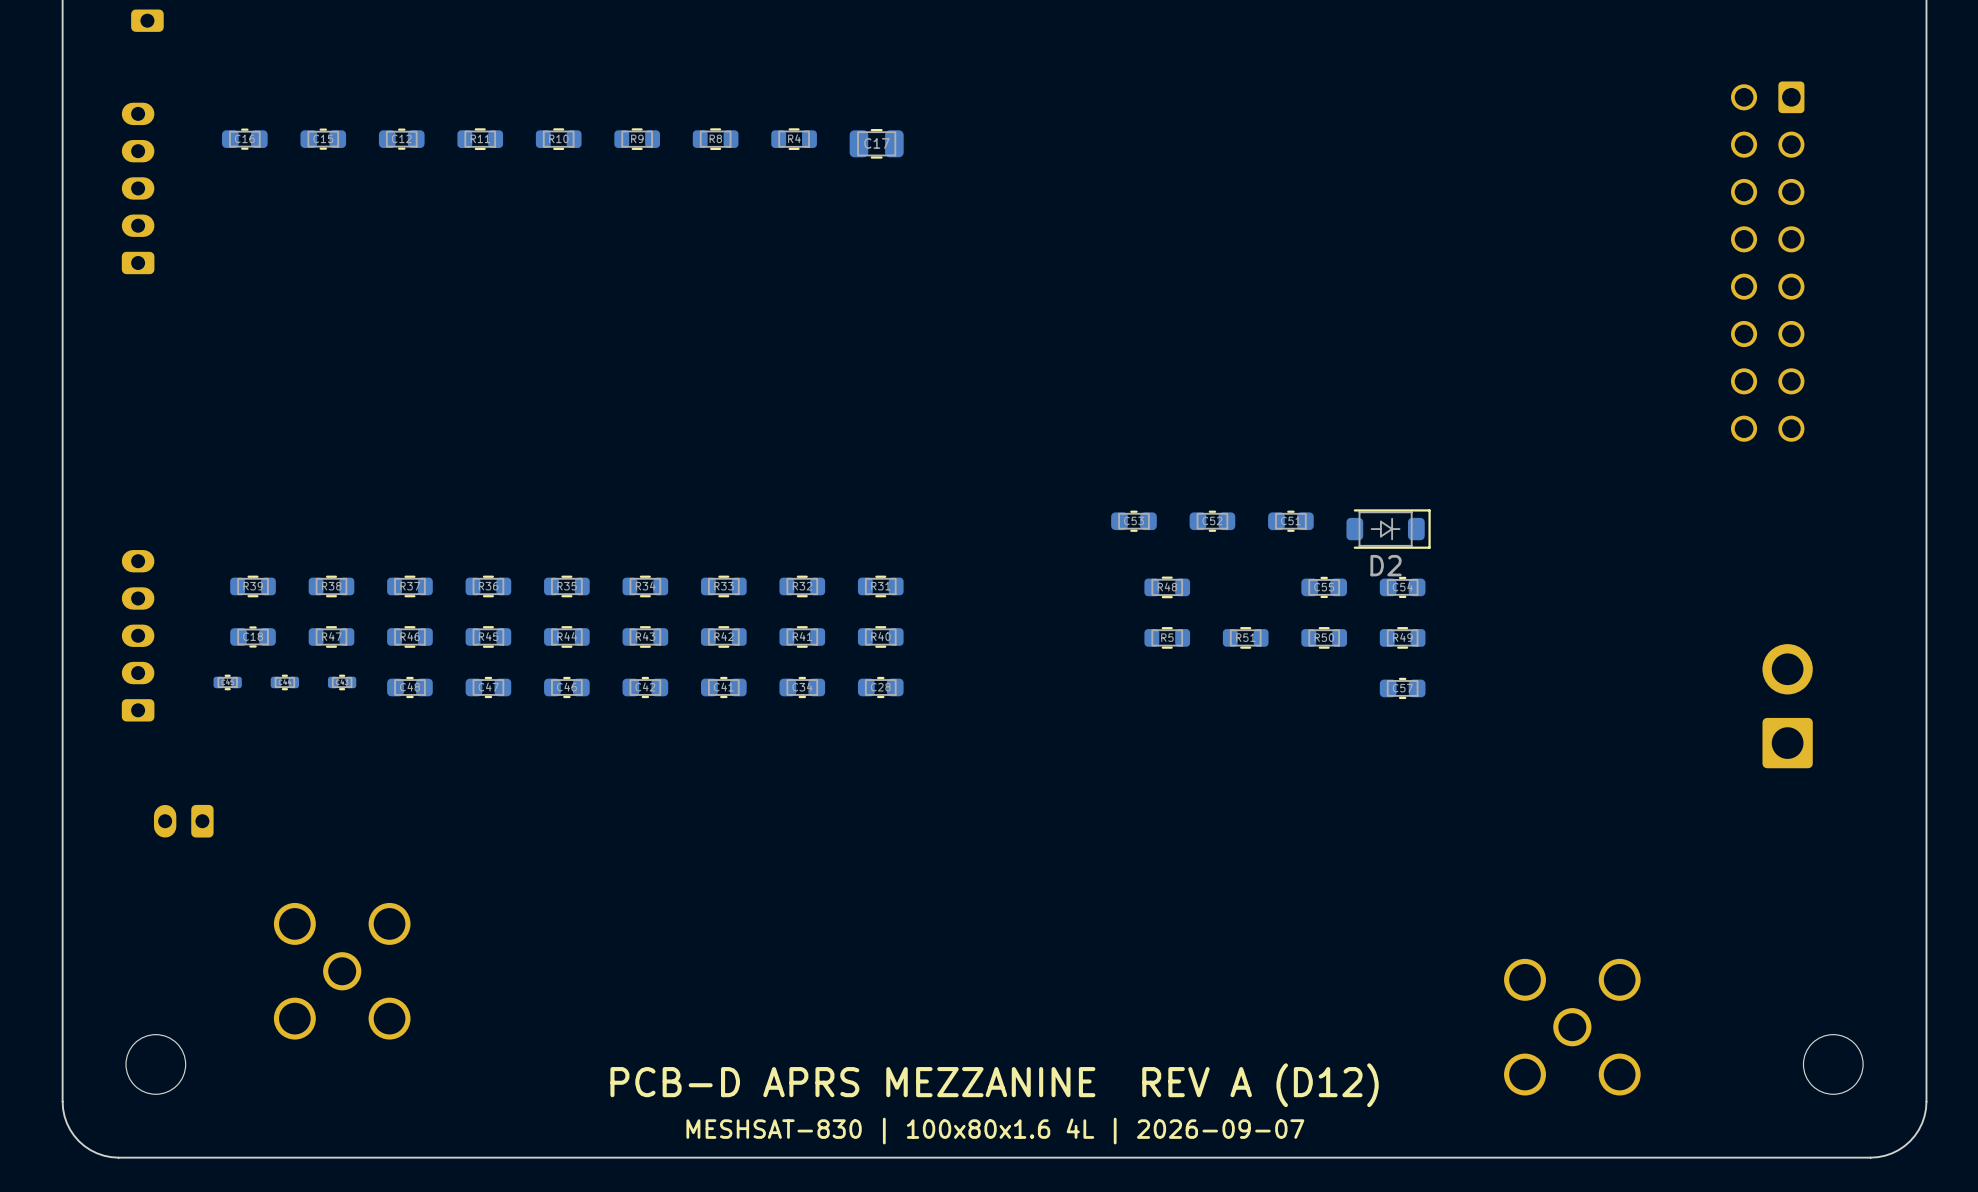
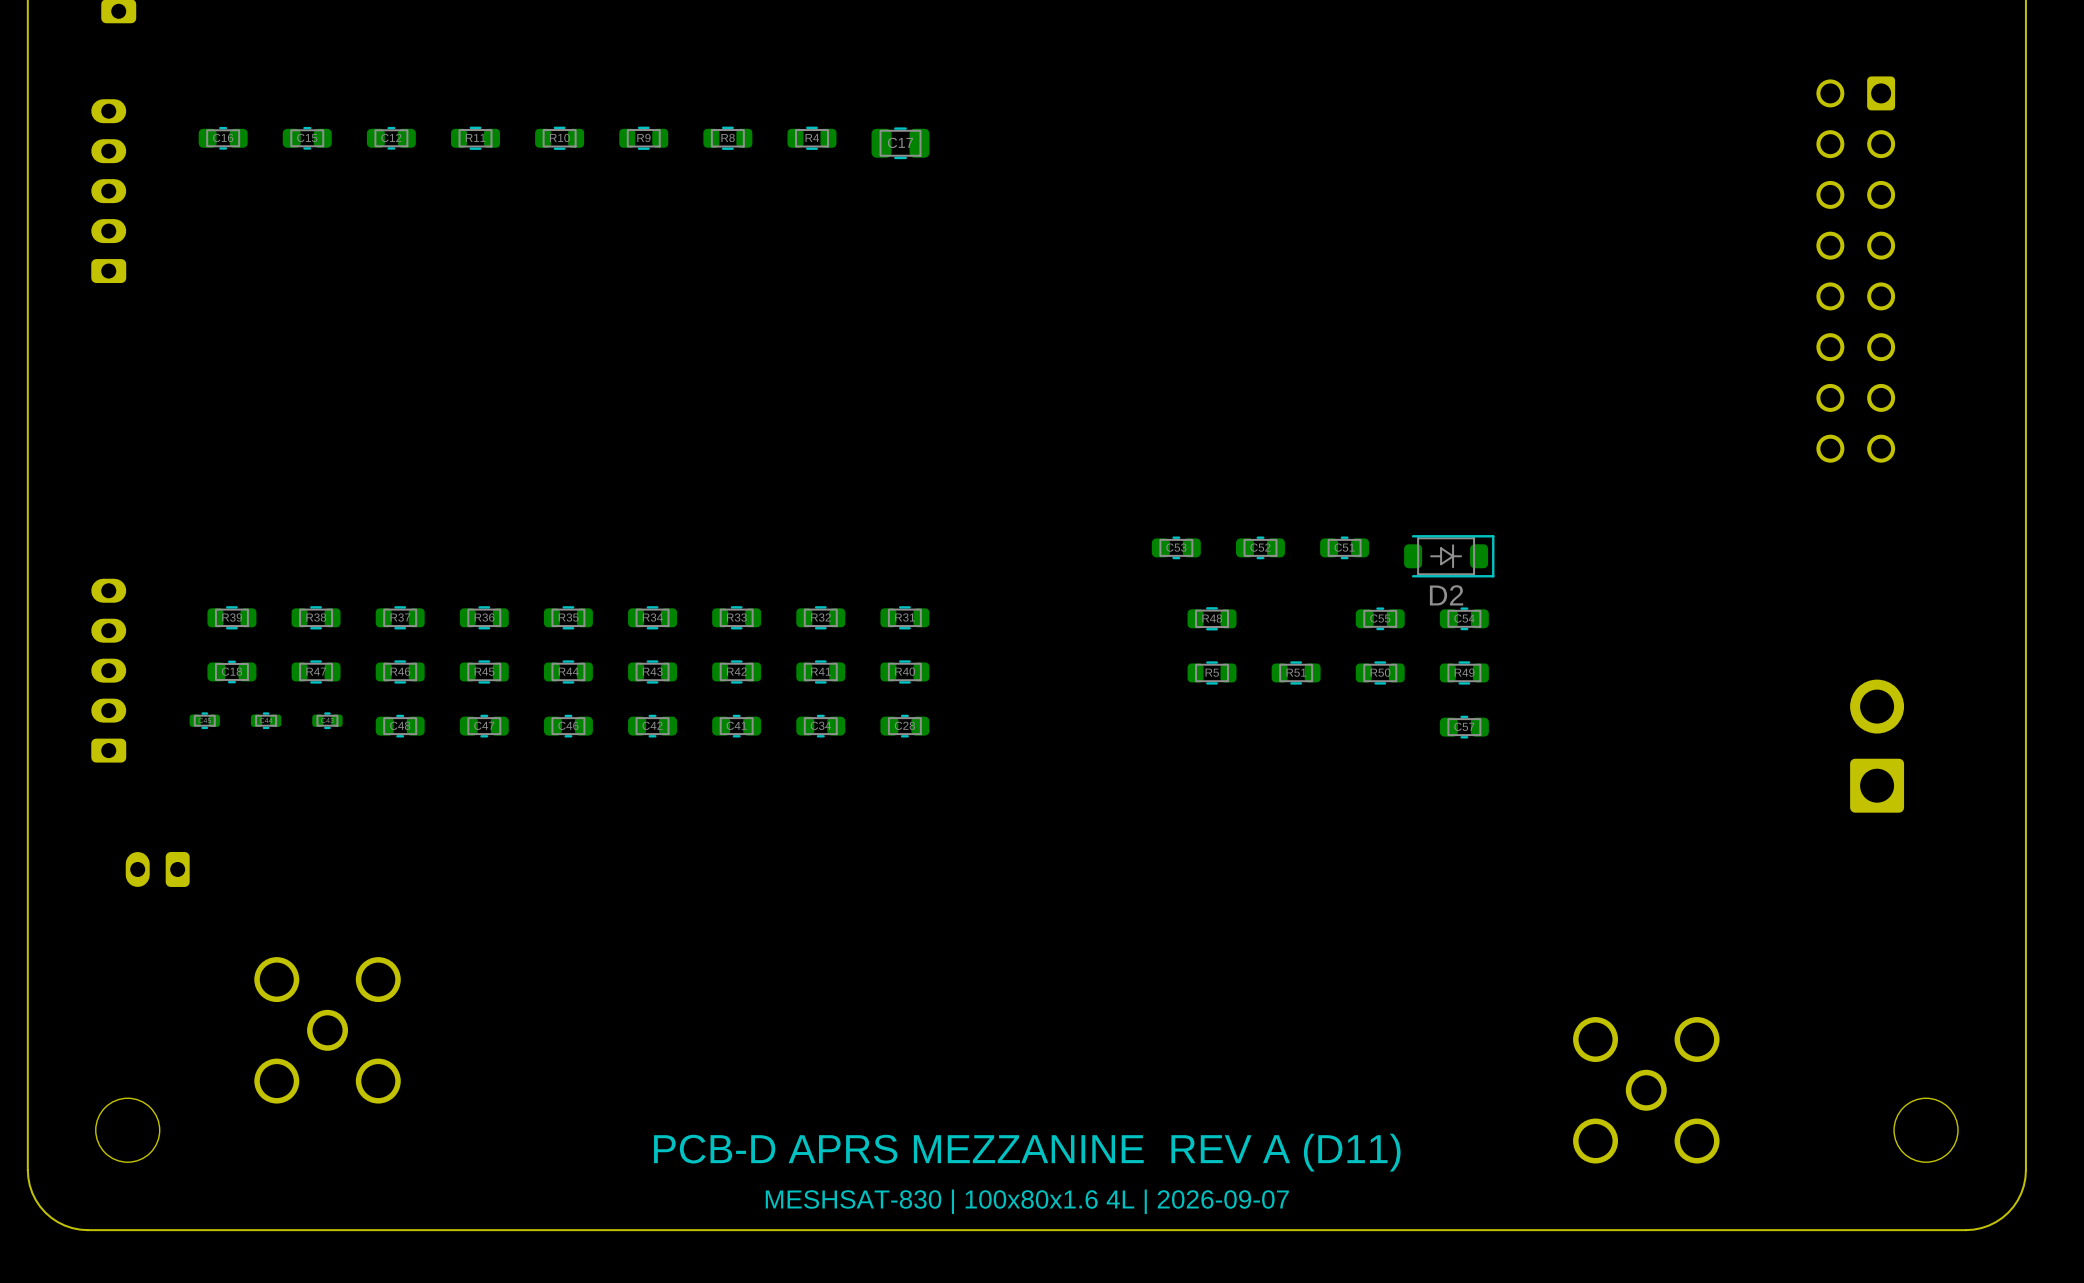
text: PCB-D APRS MEZZANINE REV A (D12) (994, 1085) -> PCB-D APRS MEZZANINE REV A (D11) (1027, 1152)

